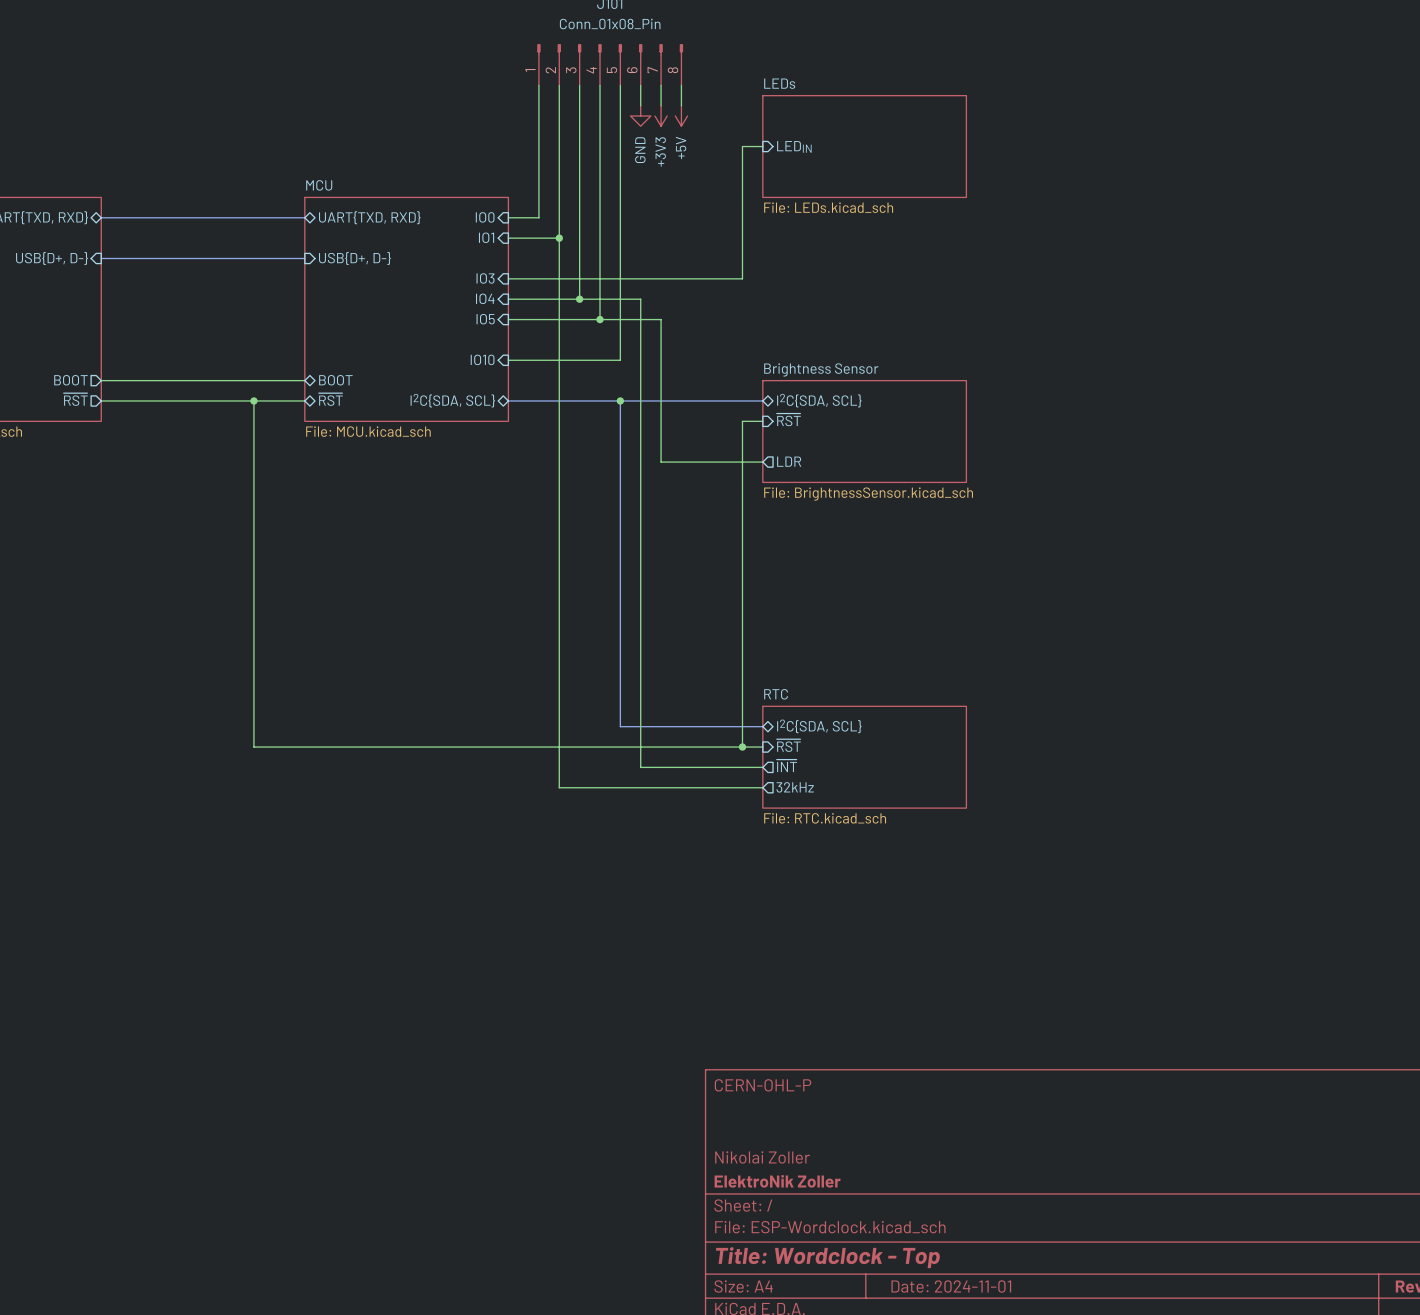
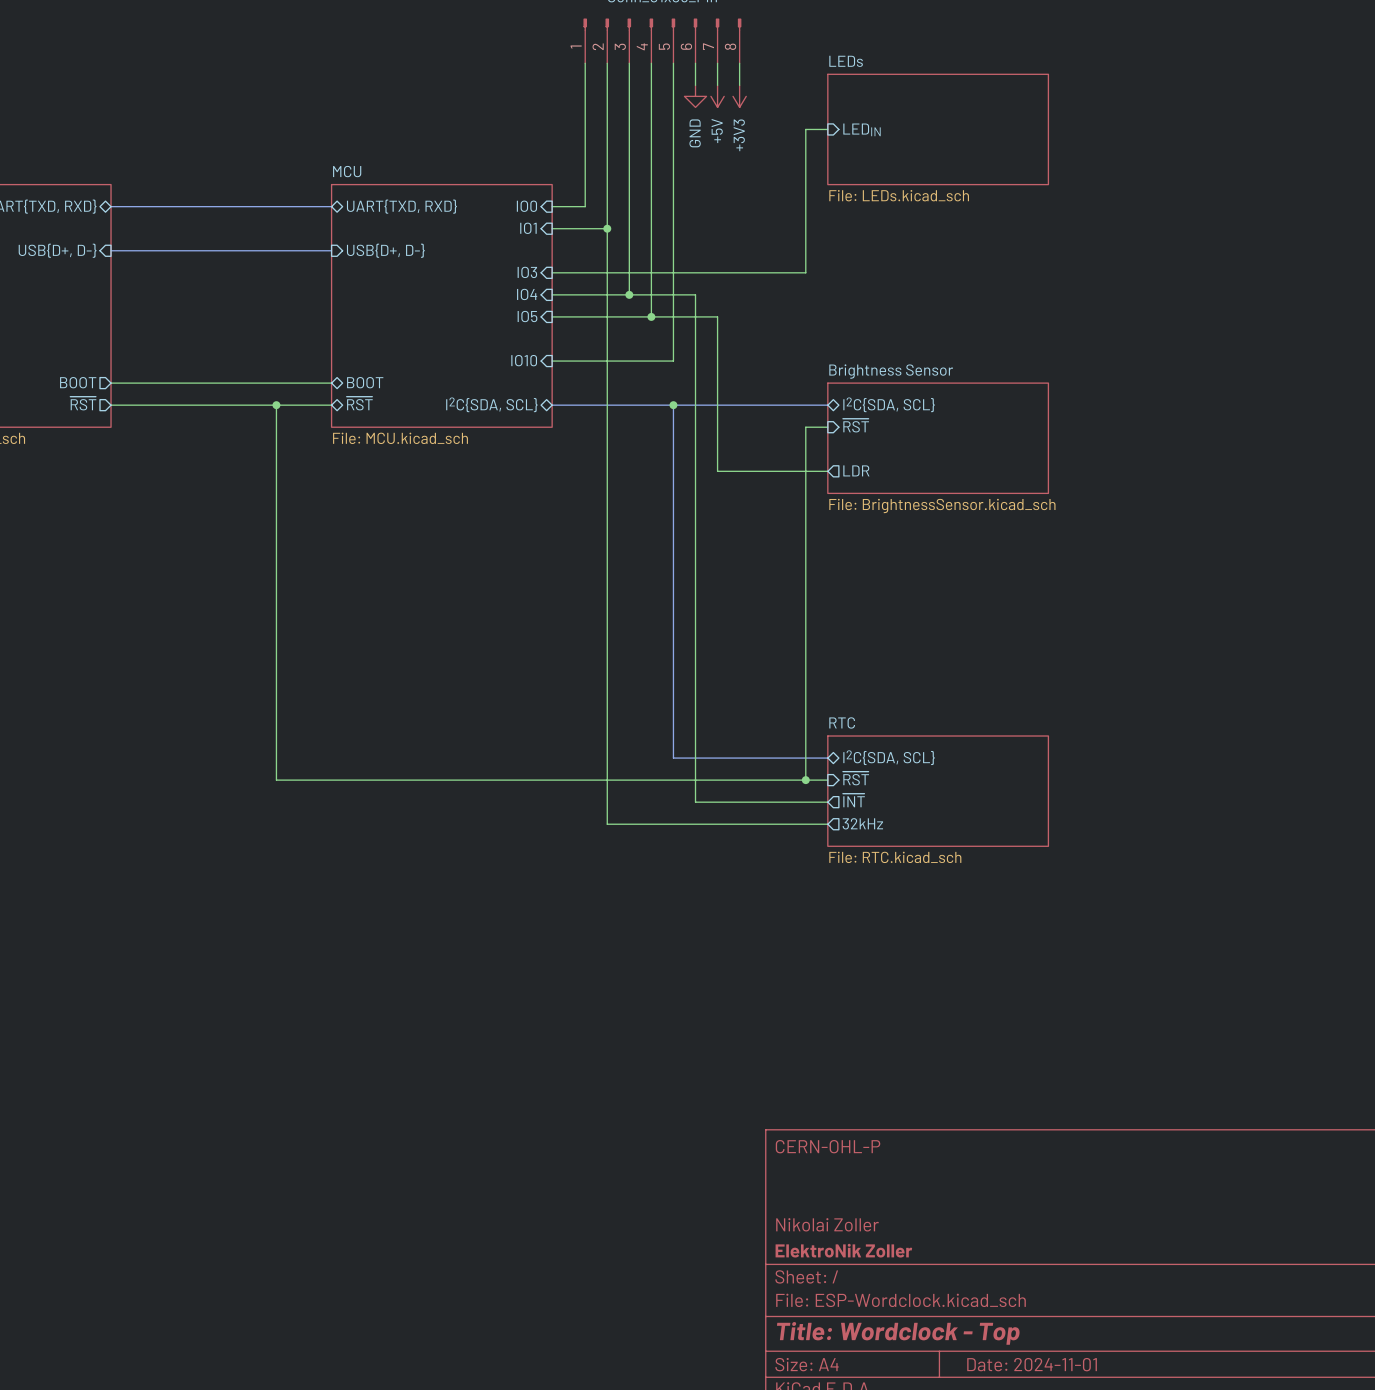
power symbol: +3V3 (661, 116) -> +5V (717, 96)
power symbol: +5V (681, 116) -> +3V3 (739, 96)

